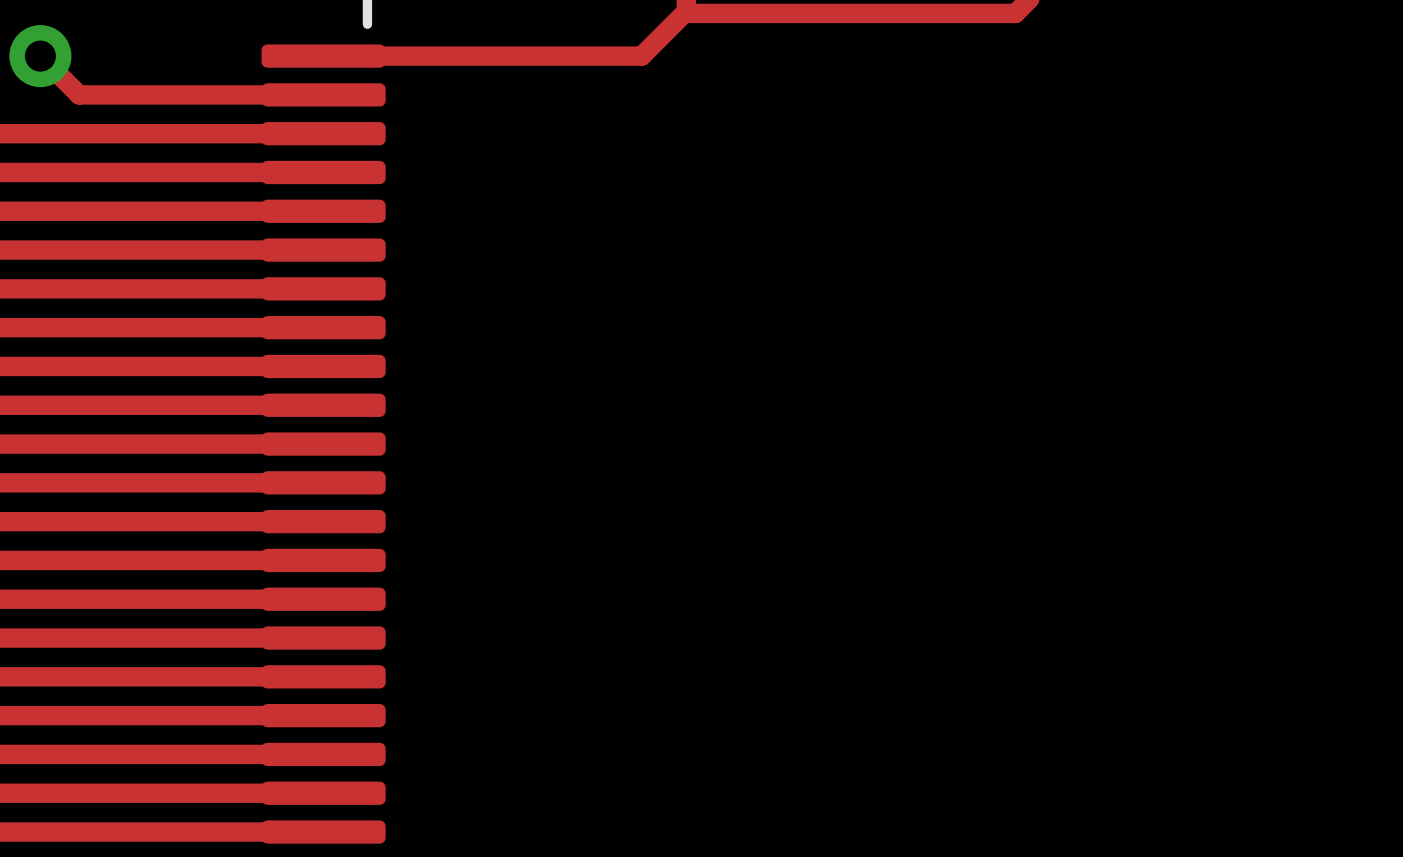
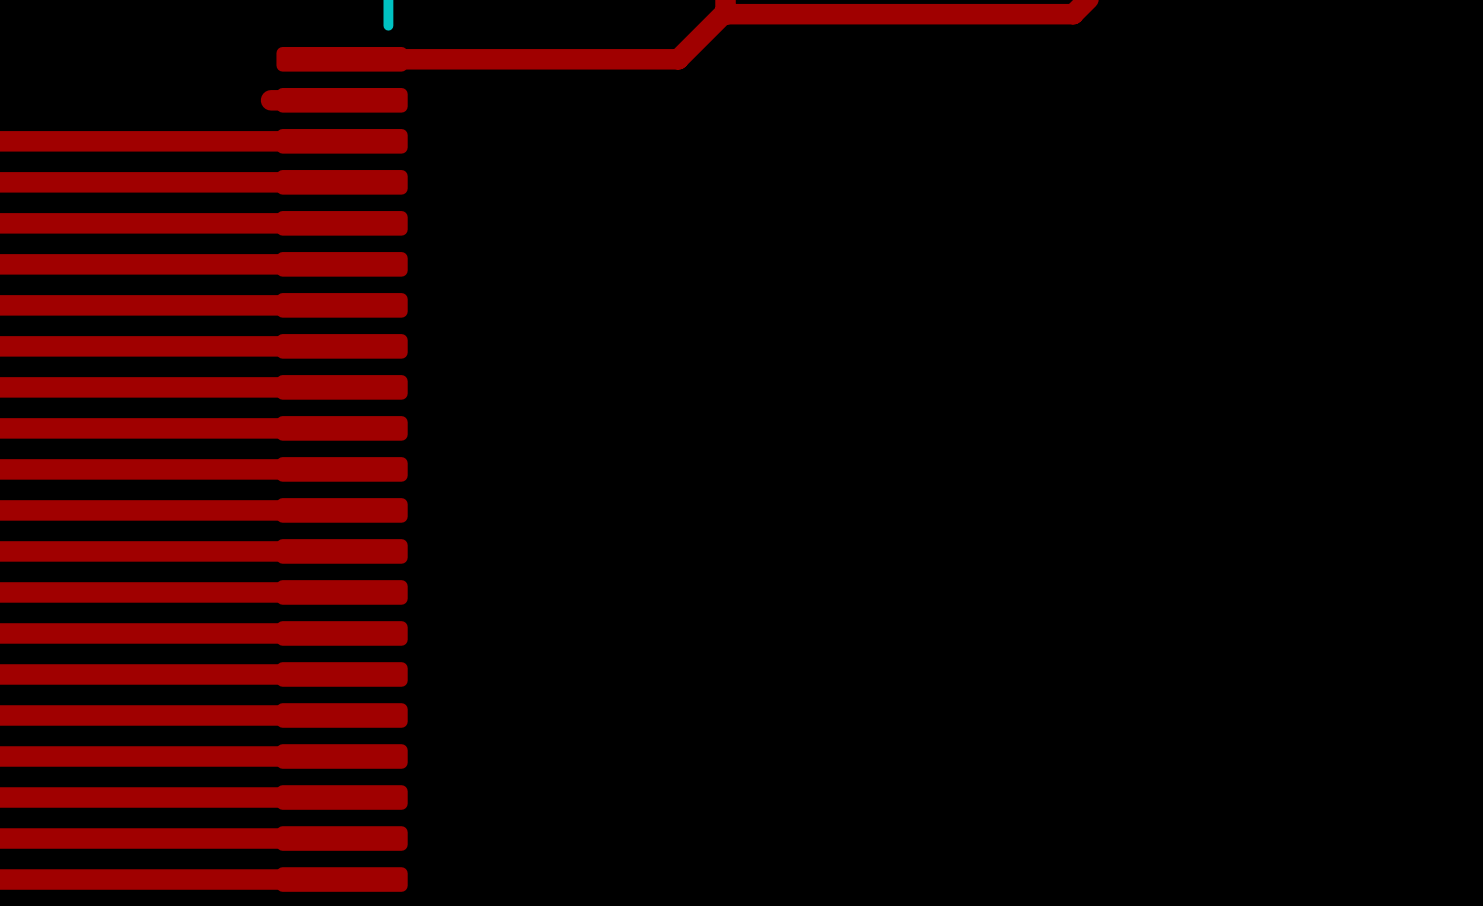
track: (40, 56) (79, 94) (256, 94) -> none
via: (40, 56) -> none

